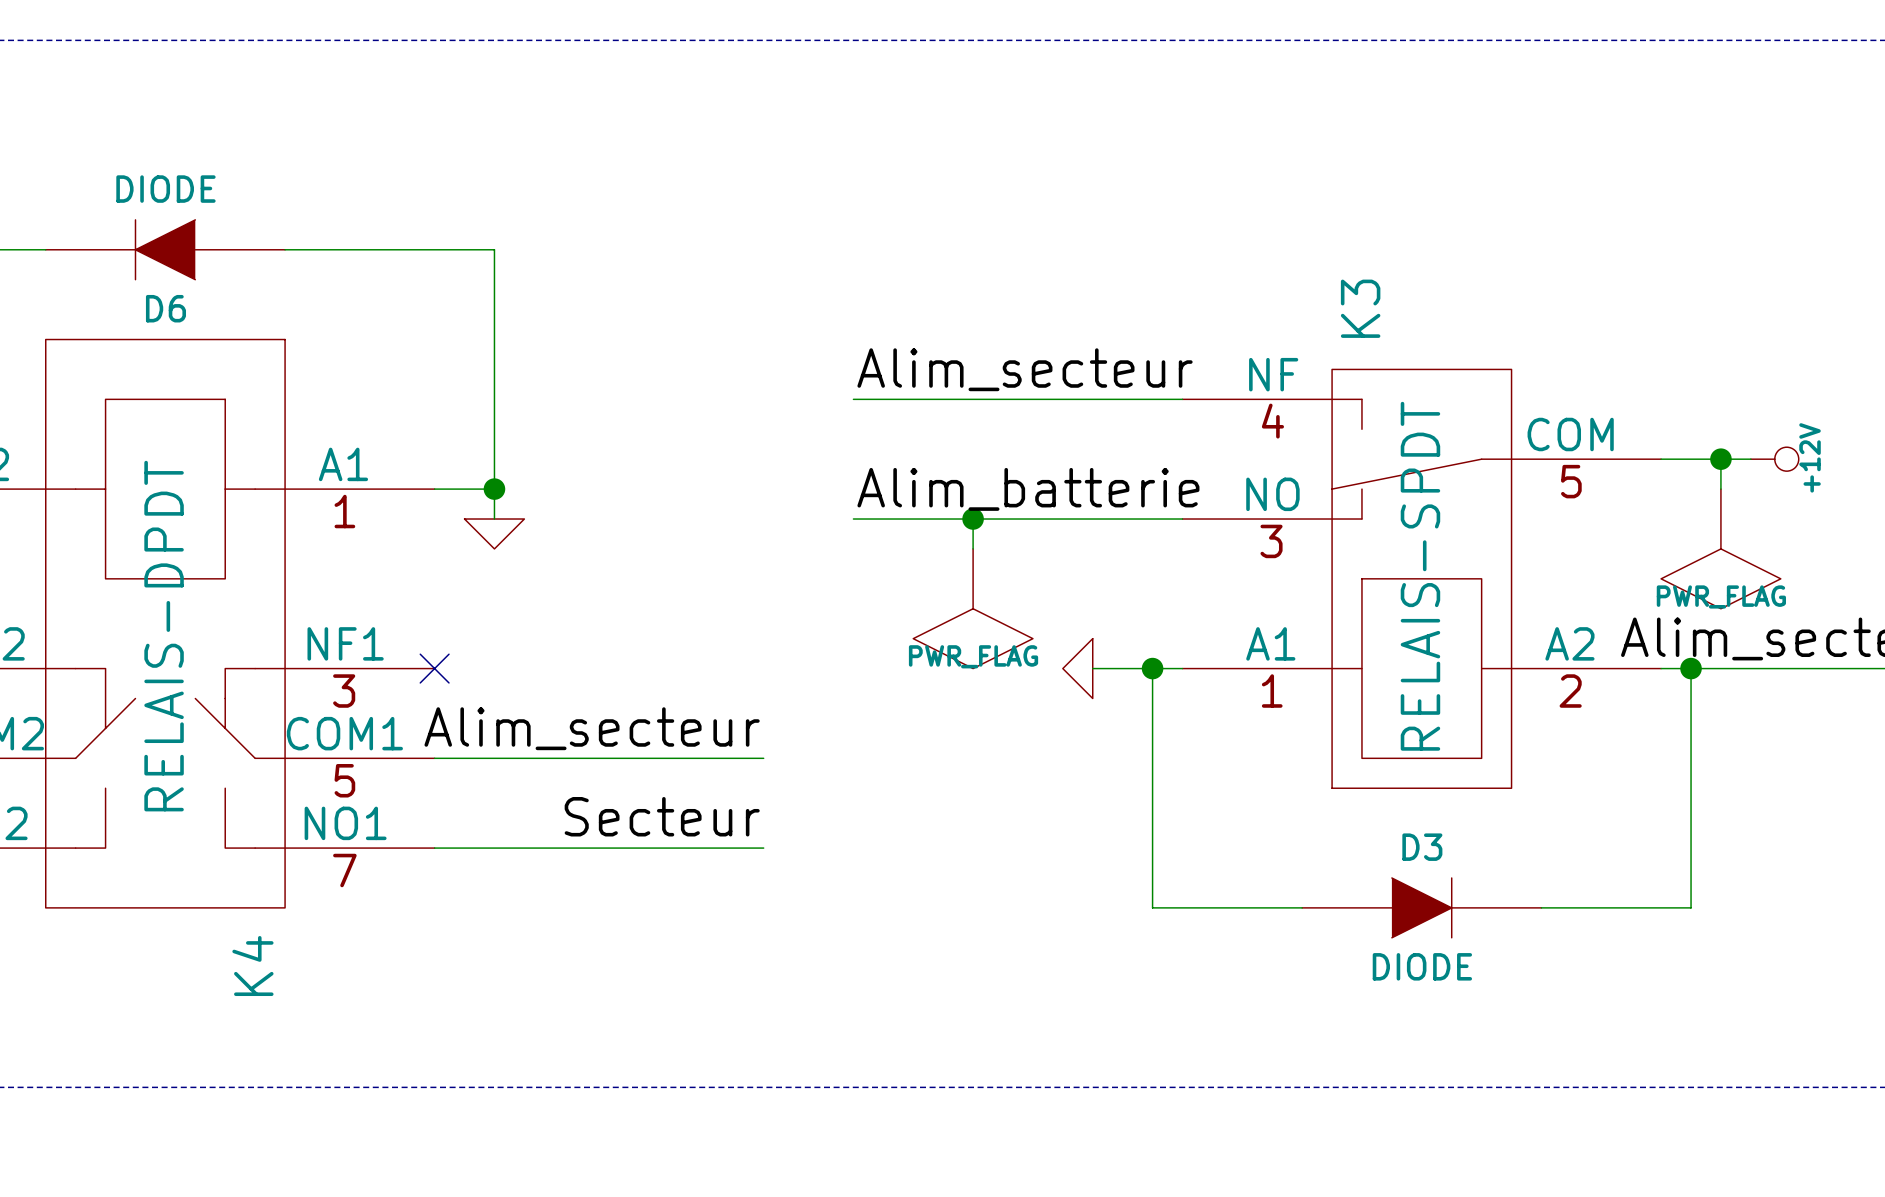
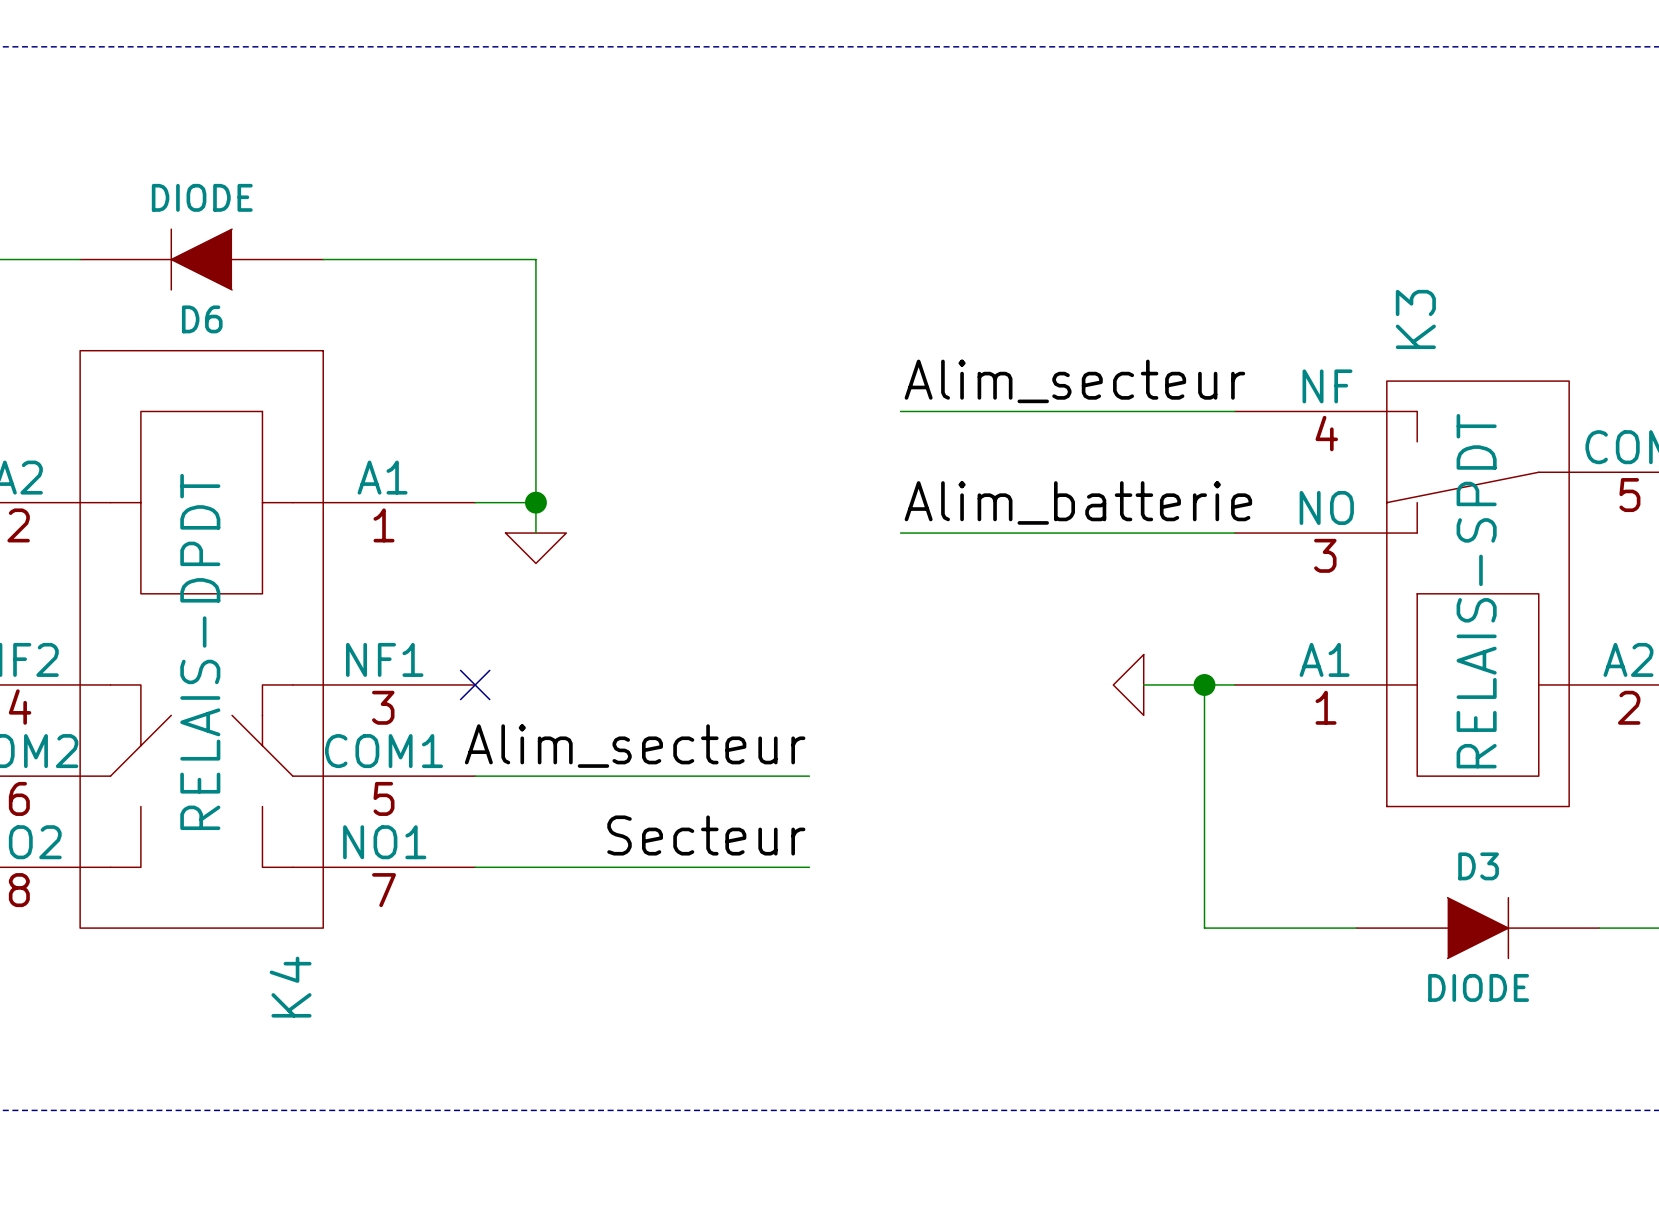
wire: (973, 519) (973, 548) -> none
junction: (973, 519) -> none
power symbol: PWR_FLAG (973, 608) -> none

